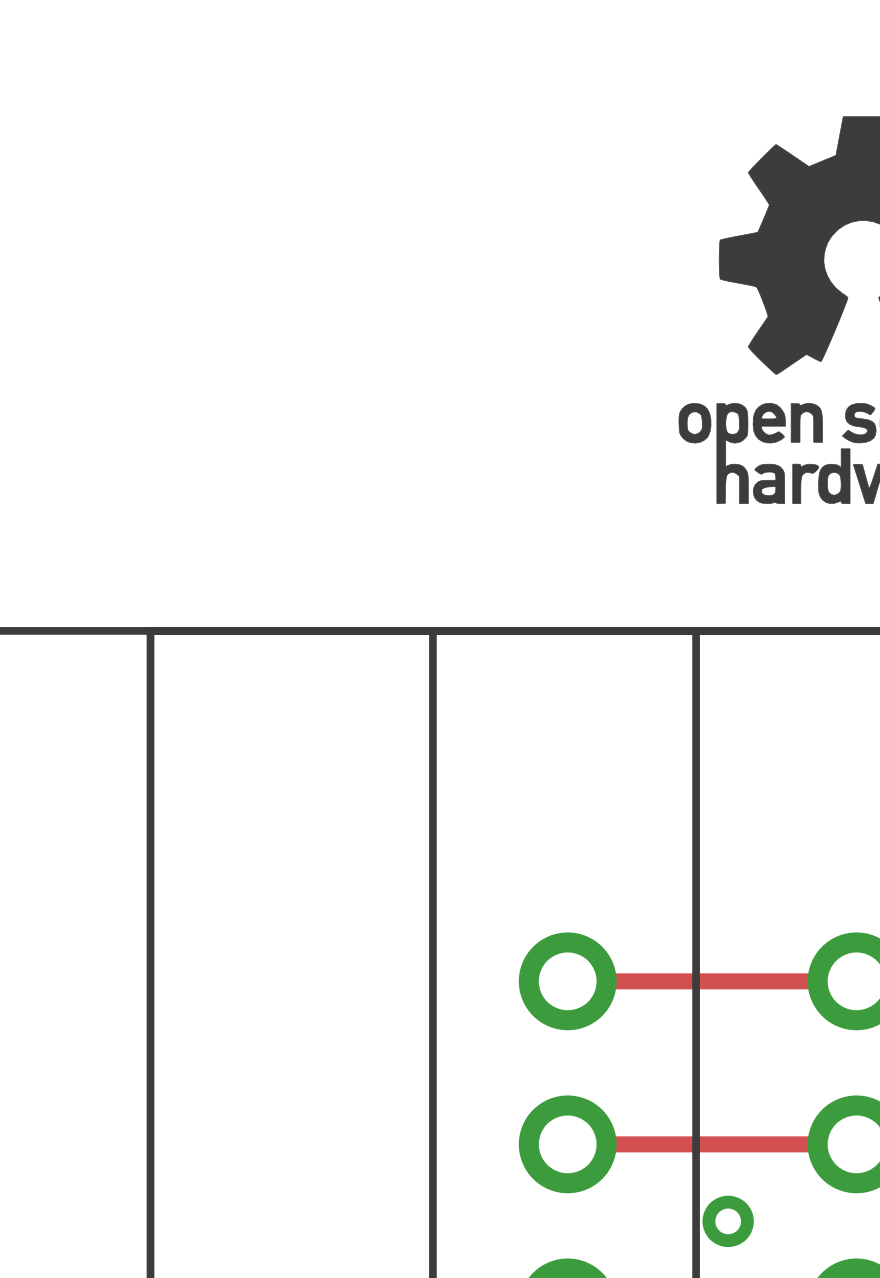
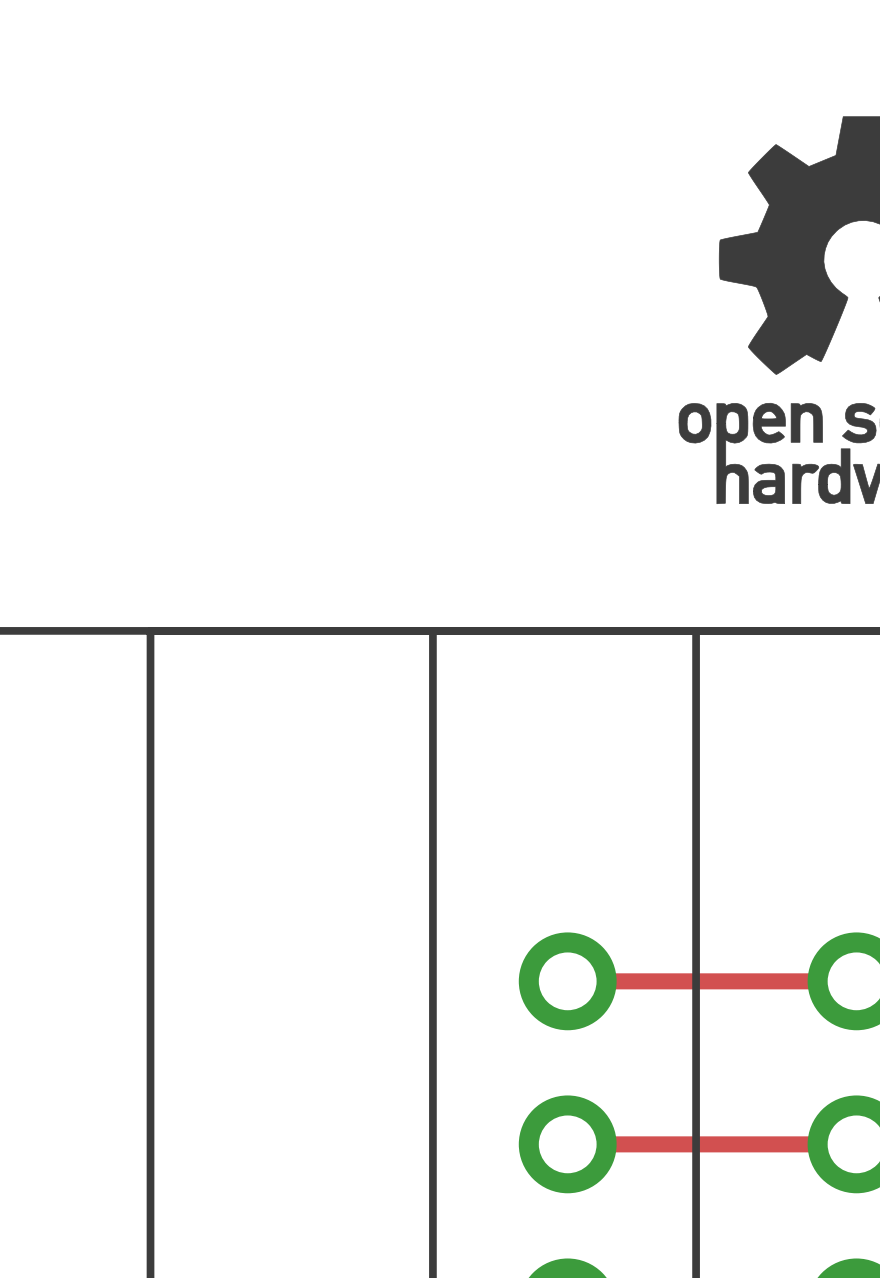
via: (728, 1221) -> none

